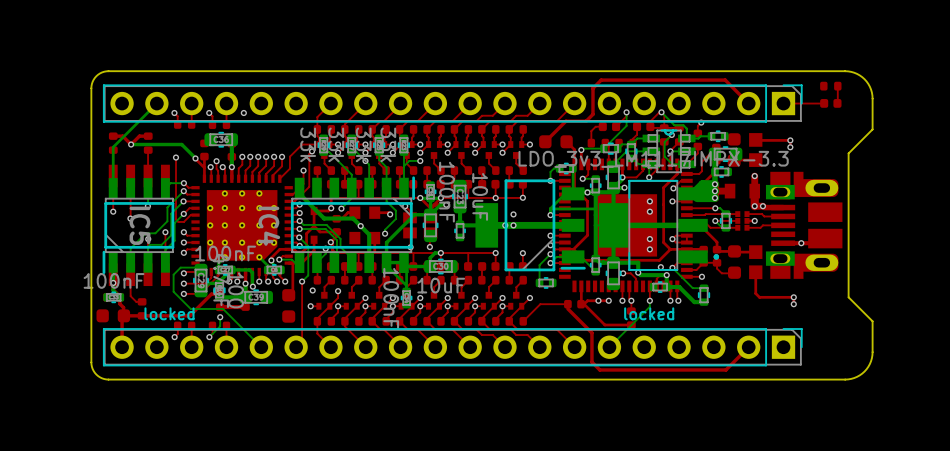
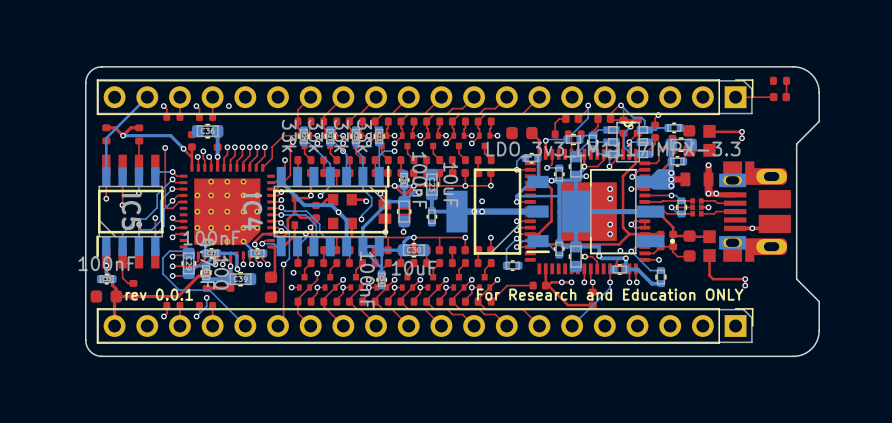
top track: (748, 103) (725, 80) (601, 80) (592, 88) (592, 114) (586, 121) (565, 121) (545, 141) -> none
top track: (567, 304) (567, 308) (591, 332) (591, 362) (599, 369) (725, 369) (748, 347) -> none
text: locked (169, 313) -> rev 0.0.1 (159, 294)
text: locked (649, 313) -> For Research and Education ONLY (610, 294)

